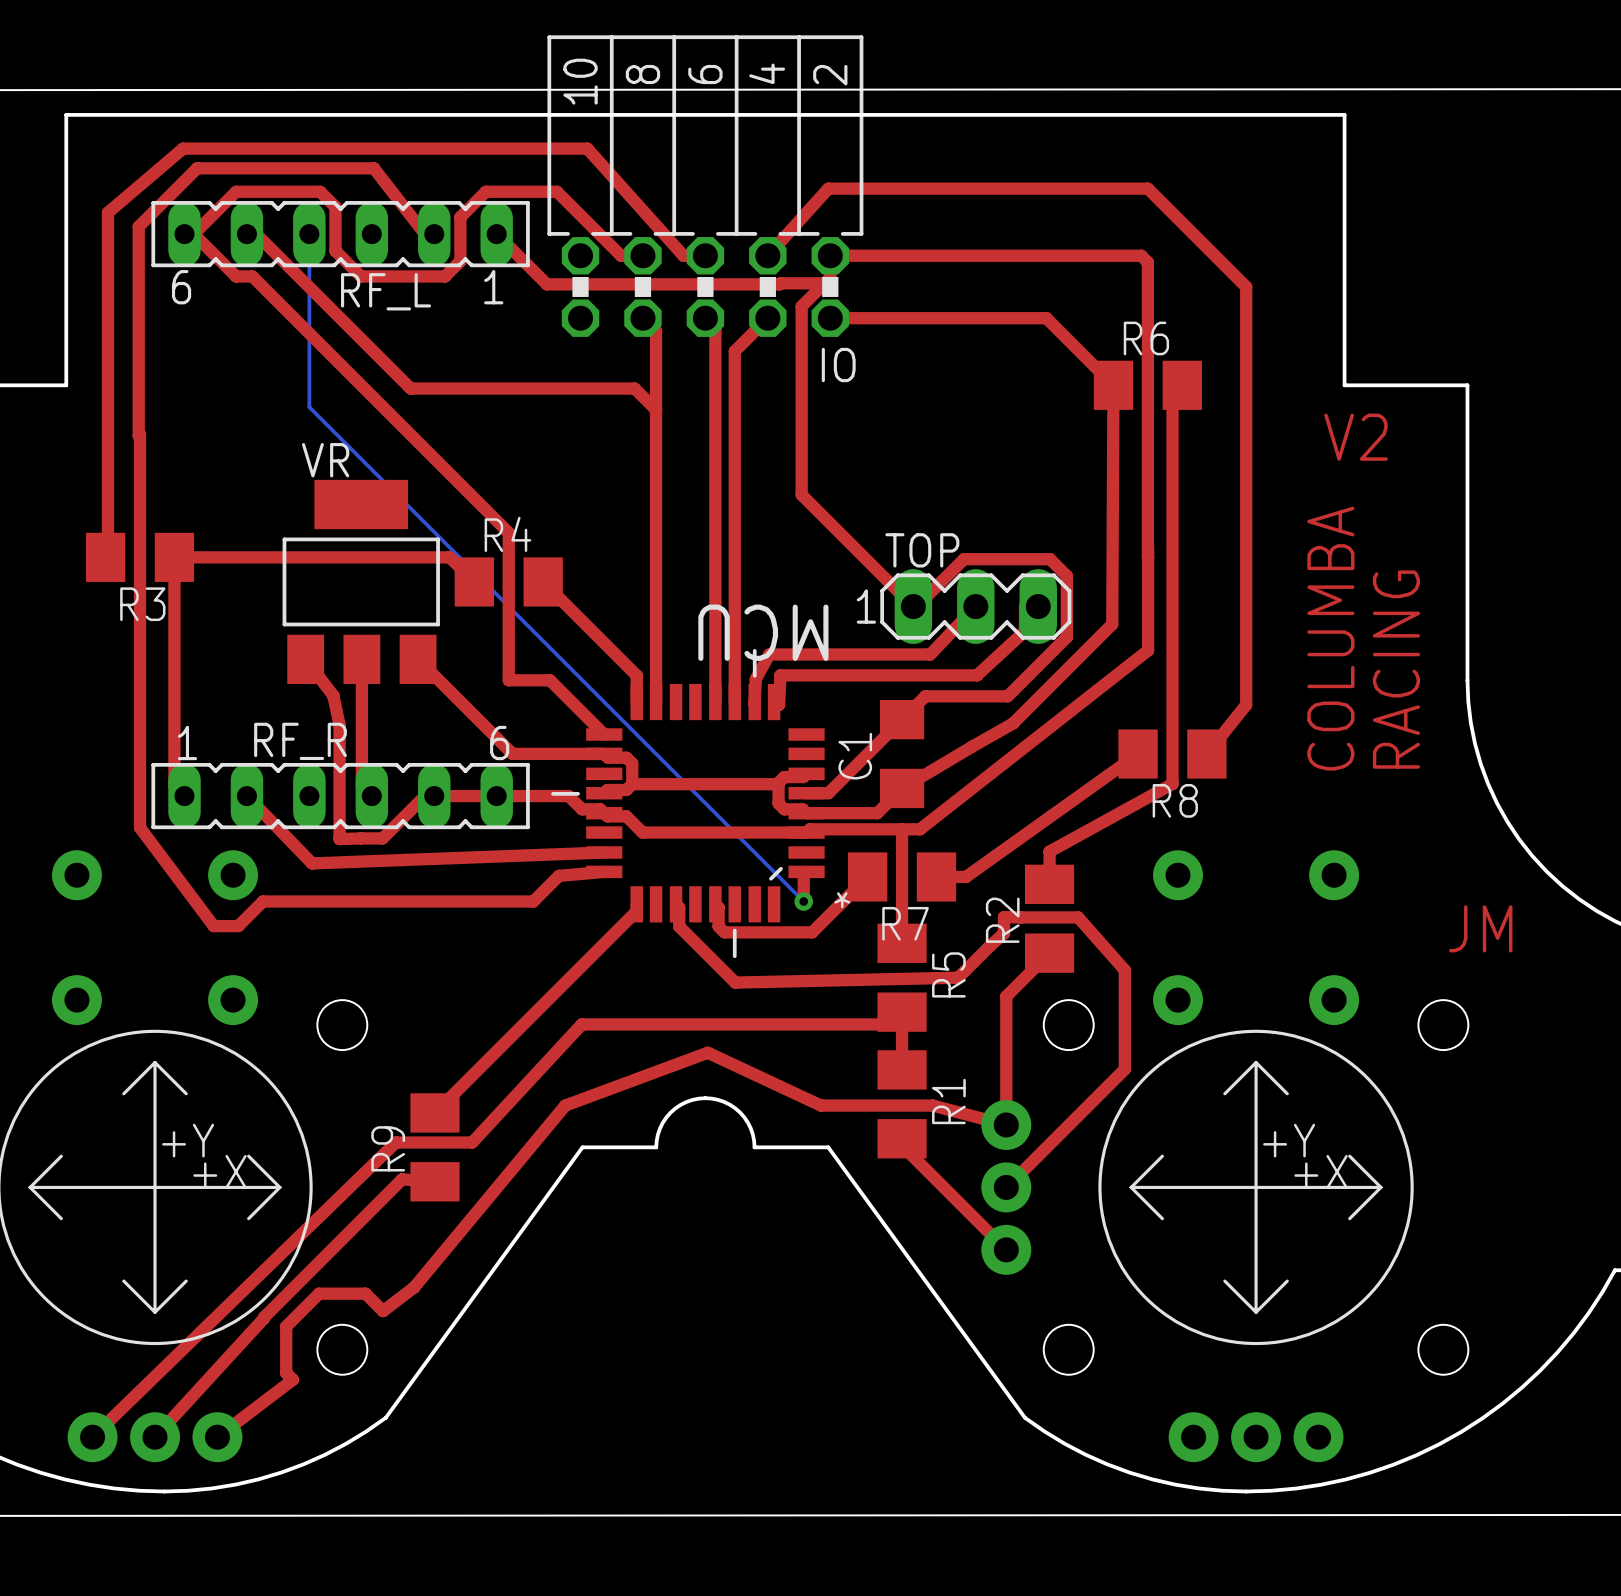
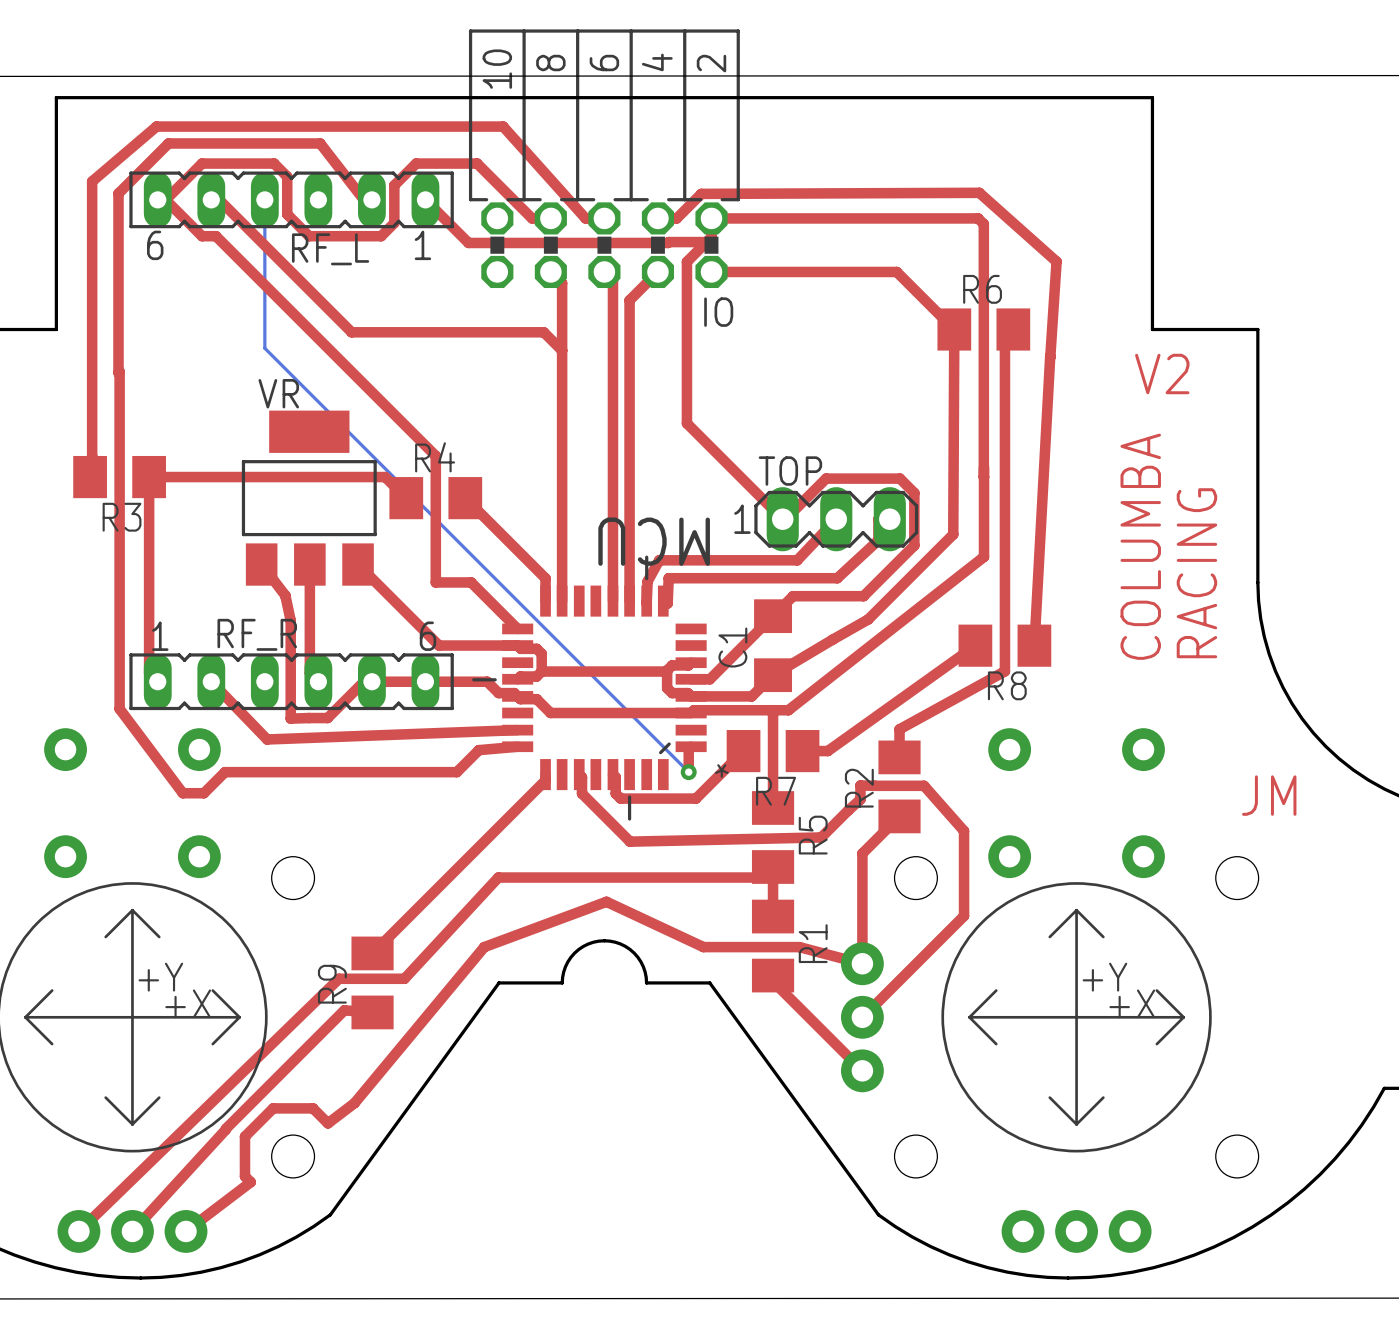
top track: (767, 255) (828, 188) (1147, 188) (1246, 286) (1246, 704) (1206, 754) -> (657, 218) (676, 218) (701, 193) (979, 192) (1056, 261) (1034, 645)

